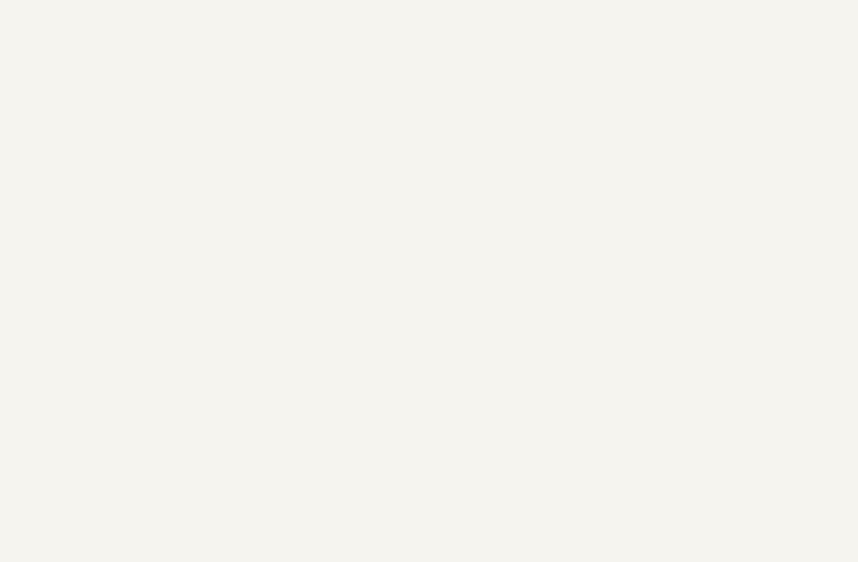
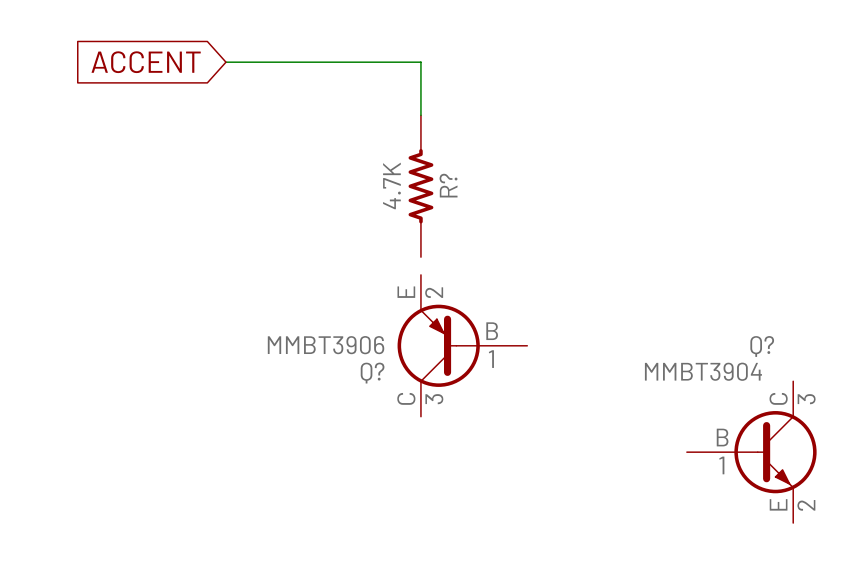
global label: none -> ACCENT (146, 62)
wire: none -> (225, 62) (420, 62) (420, 115)
R?: none -> 4.7K (420, 186)
Q?: none -> MMBT3906 (462, 345)
Q?: none -> MMBT3904 (751, 452)

